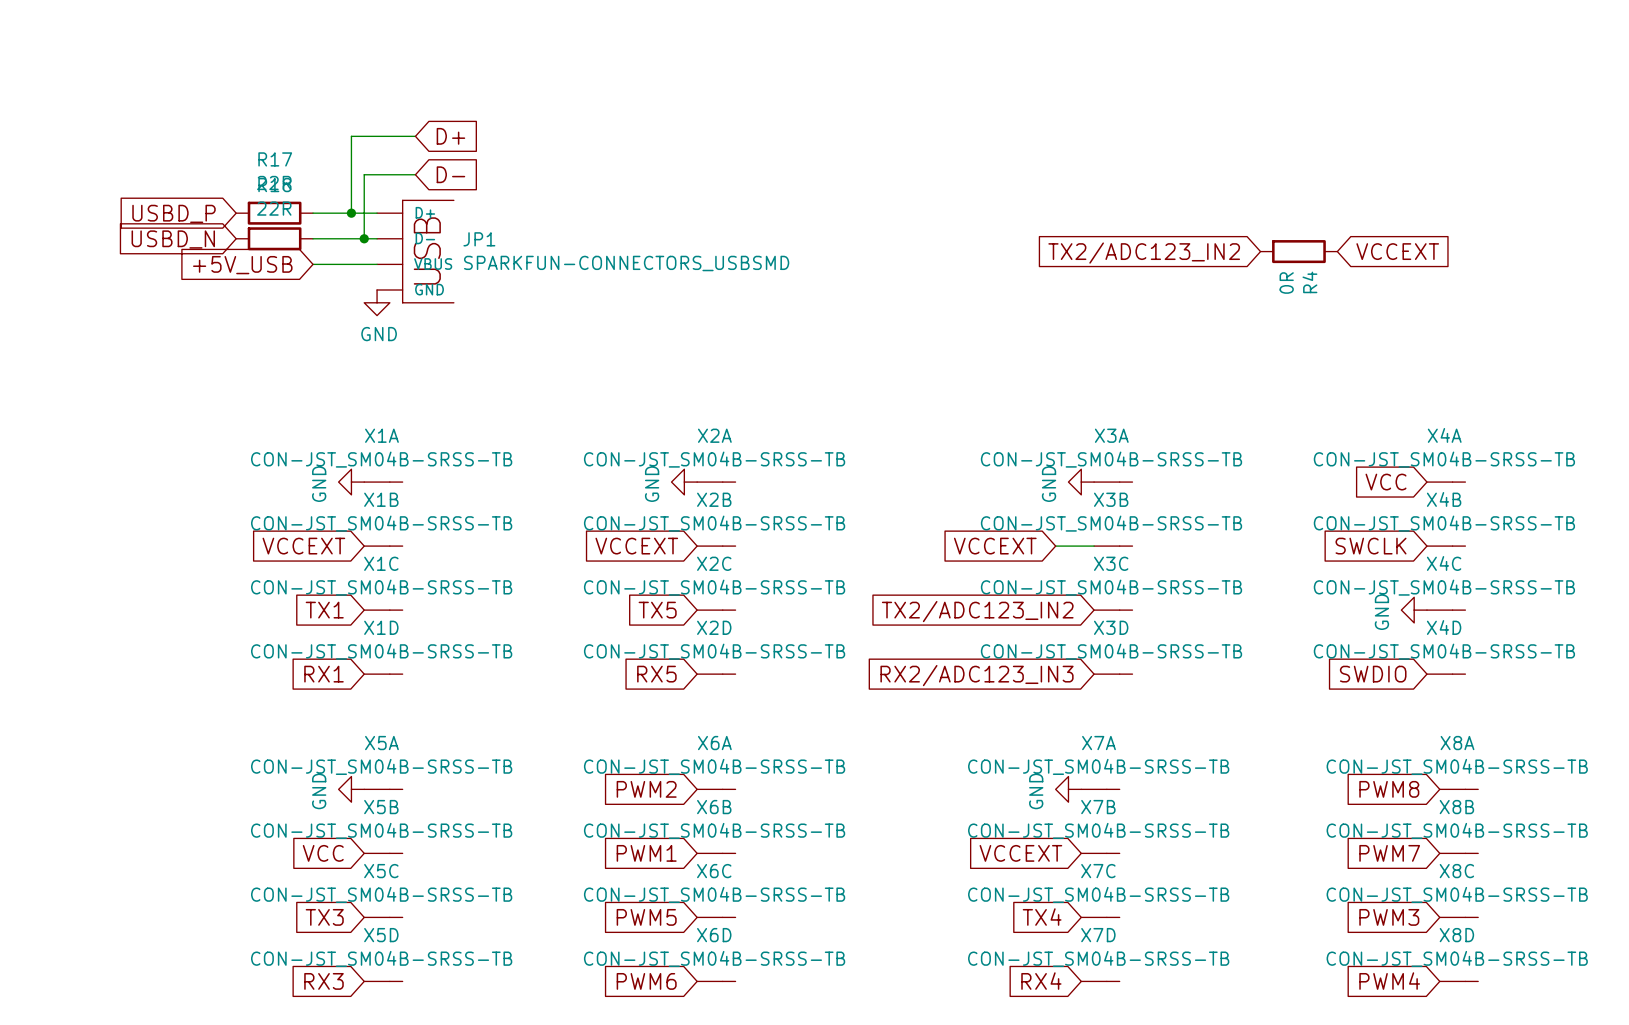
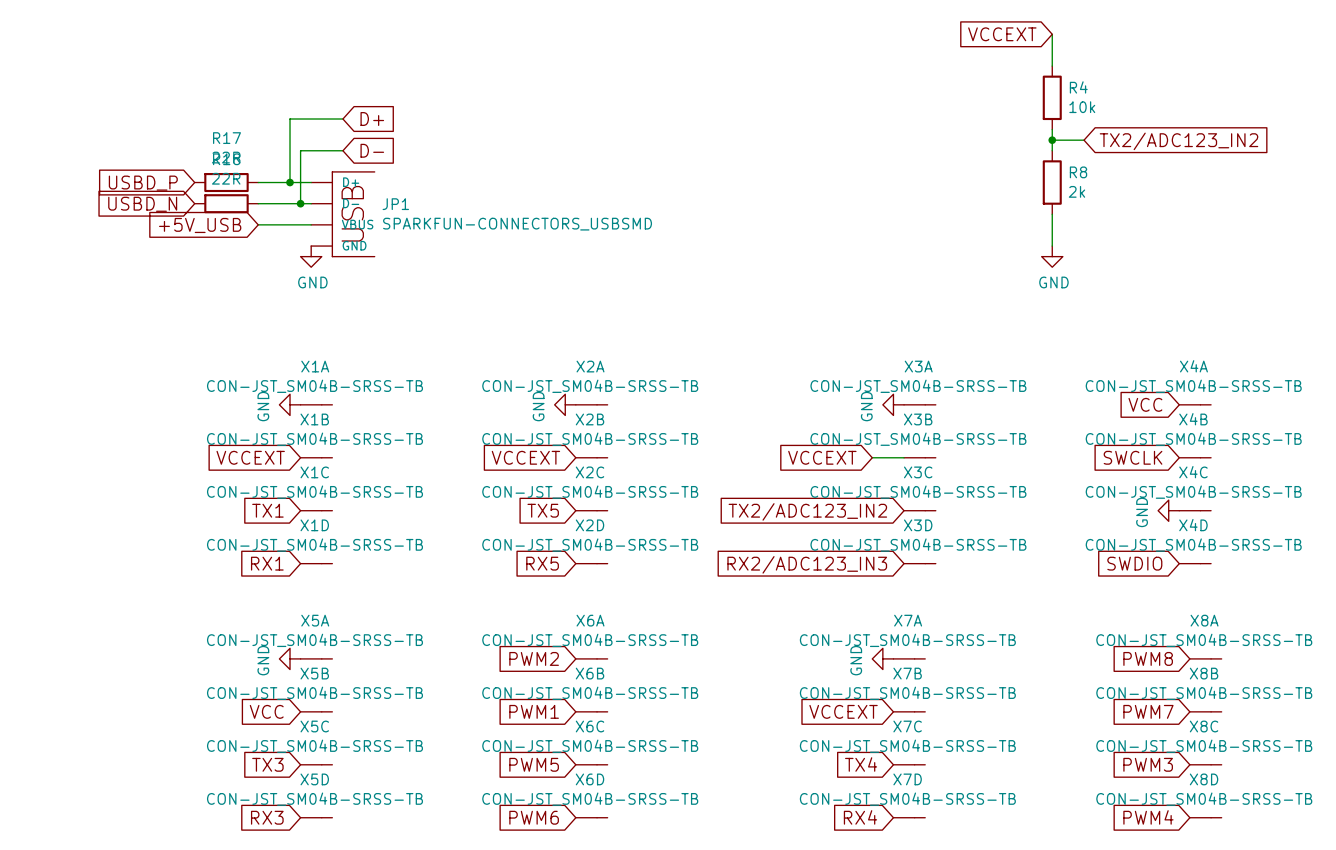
wire: none -> (1052, 34) (1052, 66)
wire: none -> (1052, 129) (1052, 150)
wire: none -> (1052, 140) (1084, 140)
junction: none -> (1052, 140)
R8: none -> 2k (1052, 182)
wire: none -> (1052, 214) (1052, 246)
R4 rotation: 0° (1298, 251) -> 90° clockwise (1052, 97)
R4 position: (1298, 251) -> (1052, 97)
global label rotation: 0° (1397, 251) -> 180° (1002, 34)
global label position: VCCEXT (1397, 251) -> VCCEXT (1002, 34)
global label rotation: 0° (1144, 253) -> 180° (1179, 141)
global label position: TX2/ADC123_IN2 (1144, 253) -> TX2/ADC123_IN2 (1179, 141)
R4 name position: R4 (1309, 282) -> R4 (1078, 87)
R4 value: 0R (1286, 283) -> 10k (1082, 107)
power symbol: none -> GND (1052, 256)

